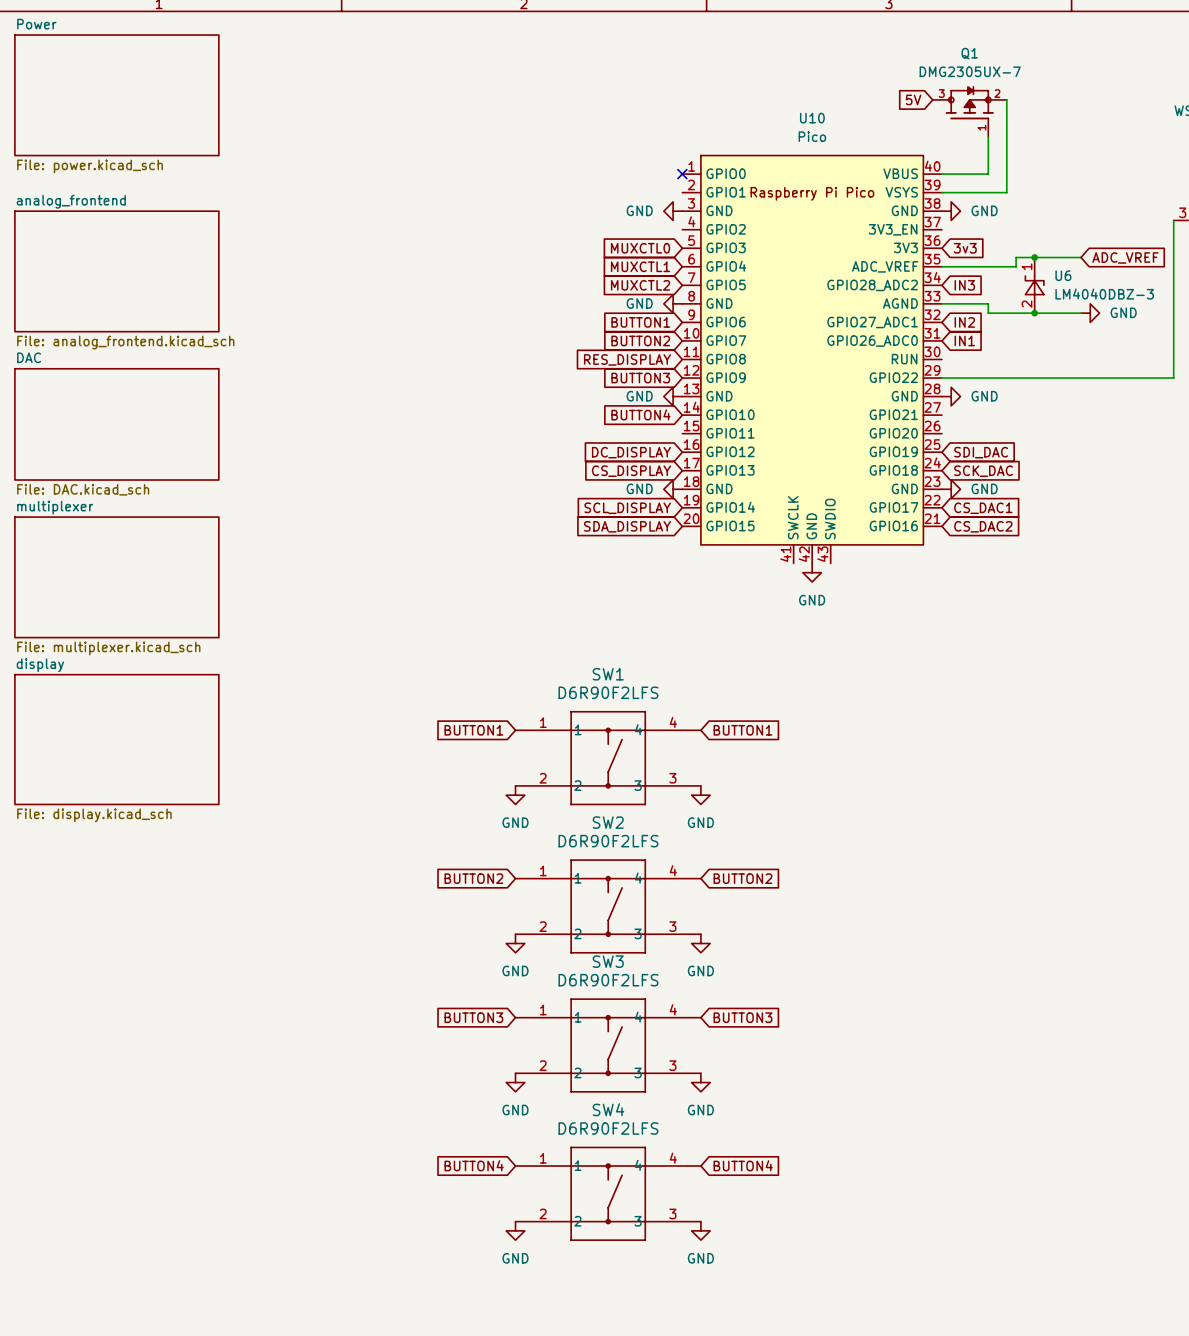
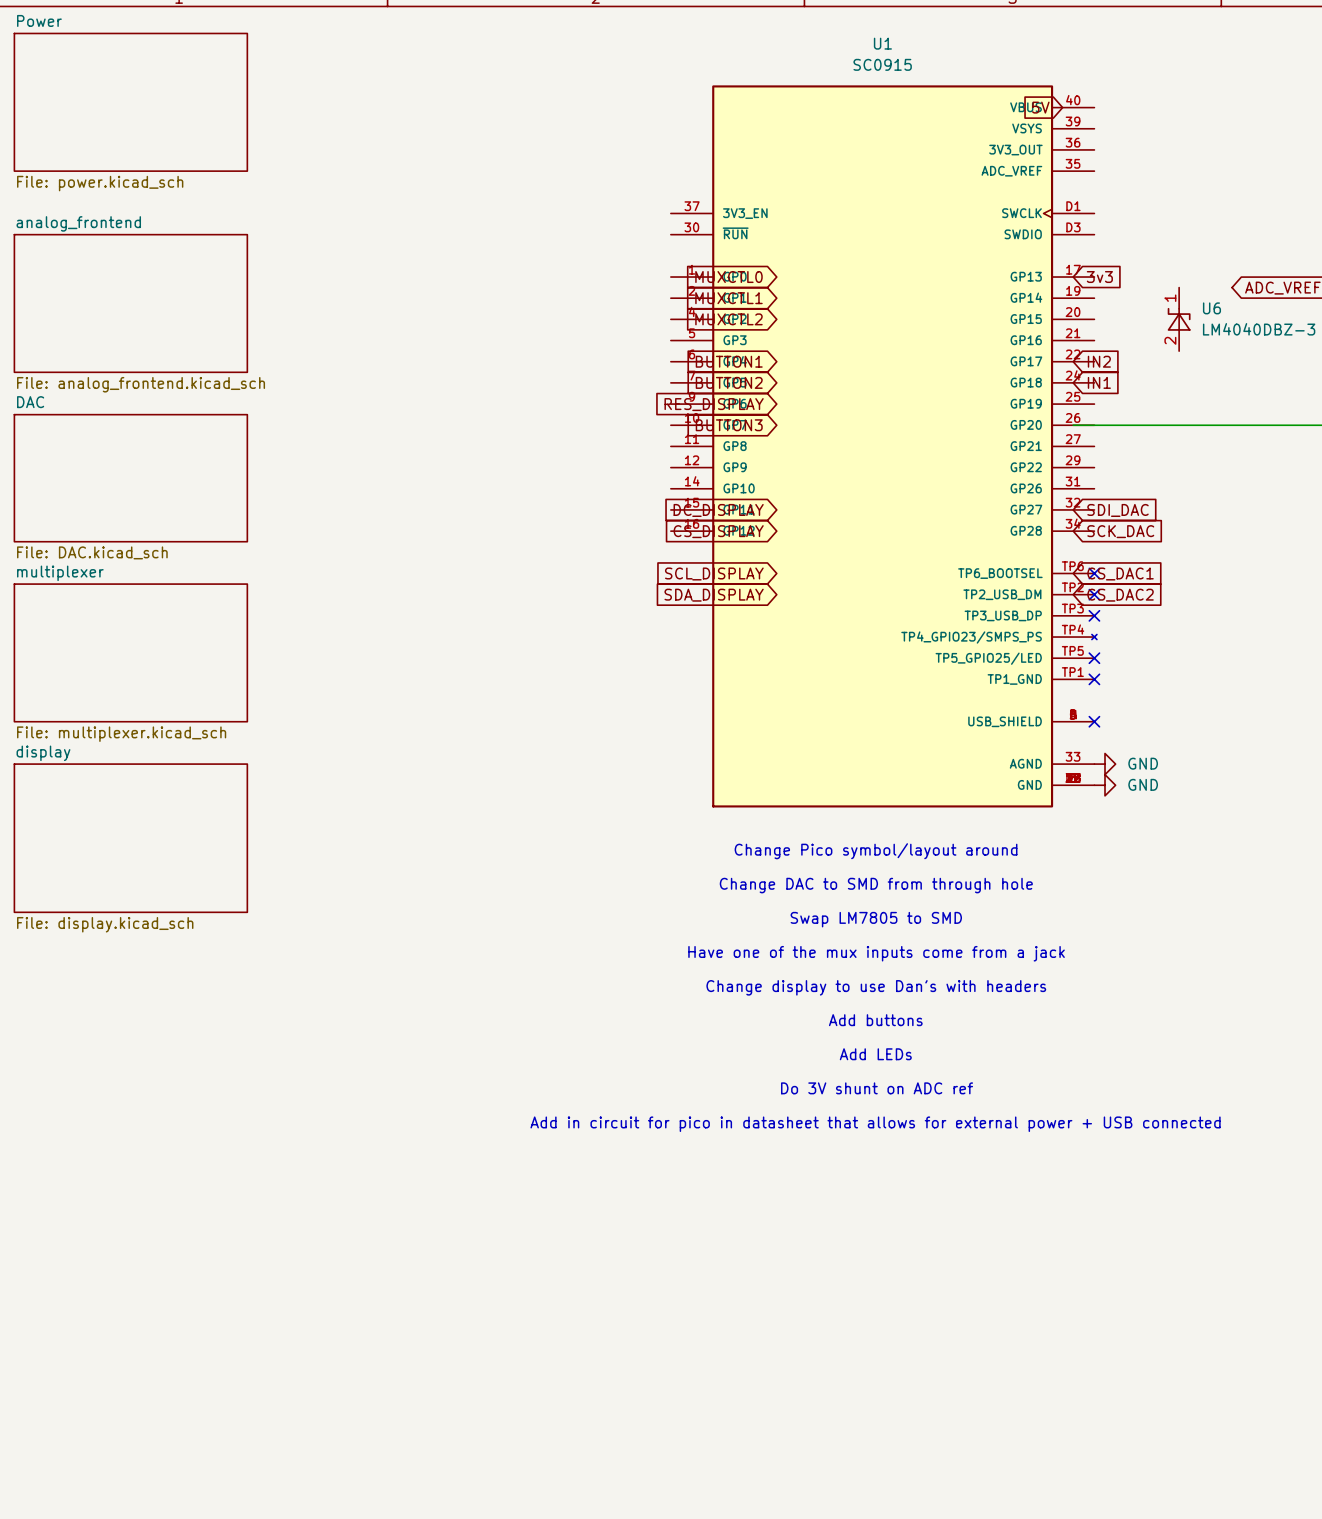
wire: (1006, 99) (1006, 192) (941, 192) -> none
Q1: DMG2305UX-7 (969, 111) -> none
wire: (988, 137) (988, 174) (941, 174) -> none
no-connect mark: (682, 174) -> none
power symbol: GND (673, 211) -> none
power symbol: GND (951, 211) -> none
junction: (1034, 257) -> none
wire: (1080, 257) (1016, 257) (1016, 266) (941, 266) -> none
global label: IN3 (964, 285) -> none
power symbol: GND (673, 303) -> none
wire: (941, 303) (988, 303) (988, 313) (1080, 313) -> none
junction: (1034, 313) -> none
power symbol: GND (1090, 313) -> none
U10: Pico (812, 359) -> none
power symbol: GND (673, 396) -> none
U1: none -> SC0915 (883, 446)
power symbol: GND (951, 396) -> none
global label: BUTTON4 (640, 414) -> none
power symbol: GND (673, 489) -> none
power symbol: GND (951, 489) -> none
no-connect mark: none -> (1094, 573)
no-connect mark: none -> (1094, 594)
no-connect mark: none -> (1094, 615)
power symbol: GND (812, 572) -> none
no-connect mark: none -> (1094, 658)
no-connect mark: none -> (1094, 679)
no-connect mark: none -> (1094, 721)
power symbol: none -> GND (1105, 764)
power symbol: none -> GND (1105, 785)
global label: BUTTON1 (473, 730) -> none
global label: BUTTON1 (742, 730) -> none
text: none -> Change Pico symbol/layout around (876, 851)
SW1: D6R90F2LFS (608, 758) -> none
text: none -> Change DAC to SMD from through hole (876, 885)
power symbol: GND (515, 795) -> none
power symbol: GND (700, 795) -> none
text: none -> Swap LM7805 to SMD (876, 919)
text: none -> Have one of the mux inputs come from a jack (876, 953)
text: none -> Change display to use Dan's with headers (876, 987)
global label: BUTTON2 (473, 878) -> none
global label: BUTTON2 (742, 878) -> none
text: none -> Add buttons (875, 1020)
SW2: D6R90F2LFS (608, 906) -> none
text: none -> Add LEDs (875, 1054)
power symbol: GND (515, 943) -> none
power symbol: GND (700, 943) -> none
text: none -> Do 3V shunt on ADC ref (877, 1088)
text: none -> Add in circuit for pico in datasheet that allows for external power + USB connected (875, 1124)
global label: BUTTON3 (473, 1017) -> none
global label: BUTTON3 (742, 1017) -> none
SW3: D6R90F2LFS (608, 1045) -> none
power symbol: GND (515, 1082) -> none
power symbol: GND (700, 1082) -> none
global label: BUTTON4 (474, 1165) -> none
global label: BUTTON4 (743, 1165) -> none
SW4: D6R90F2LFS (608, 1193) -> none
power symbol: GND (515, 1230) -> none
power symbol: GND (700, 1230) -> none

